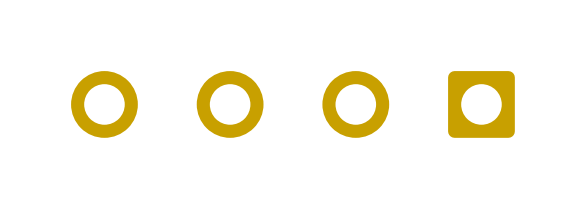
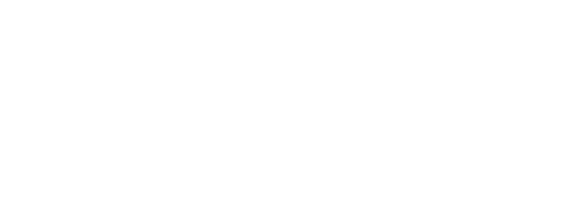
part: (292, 104) -> none

